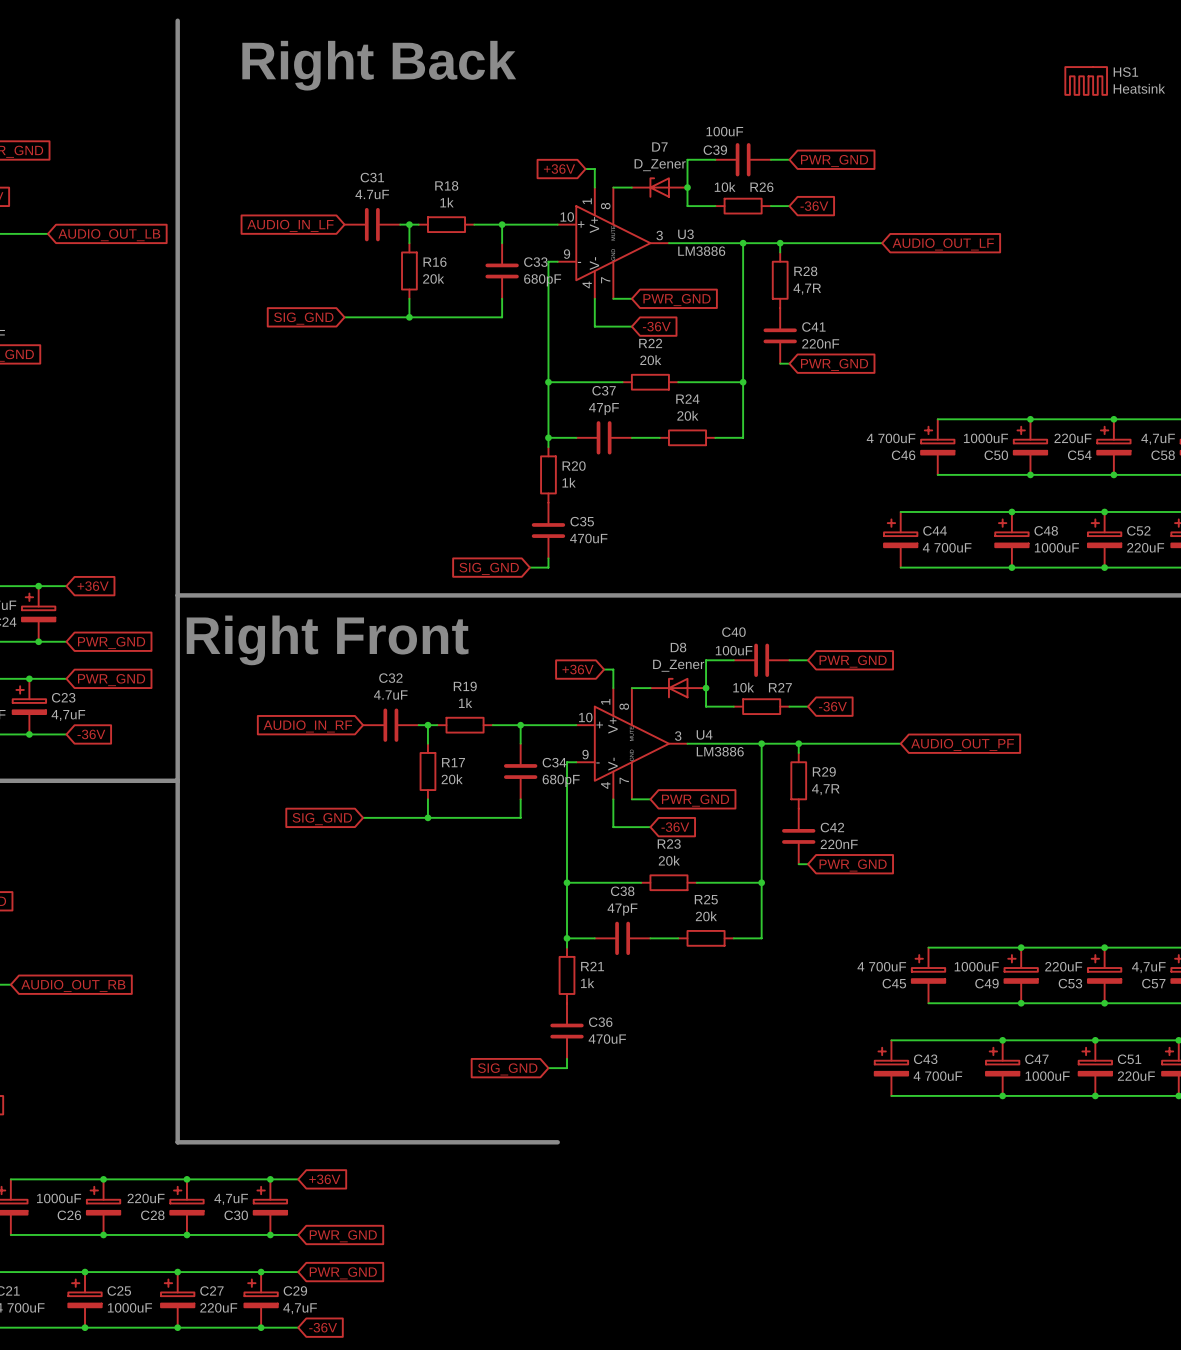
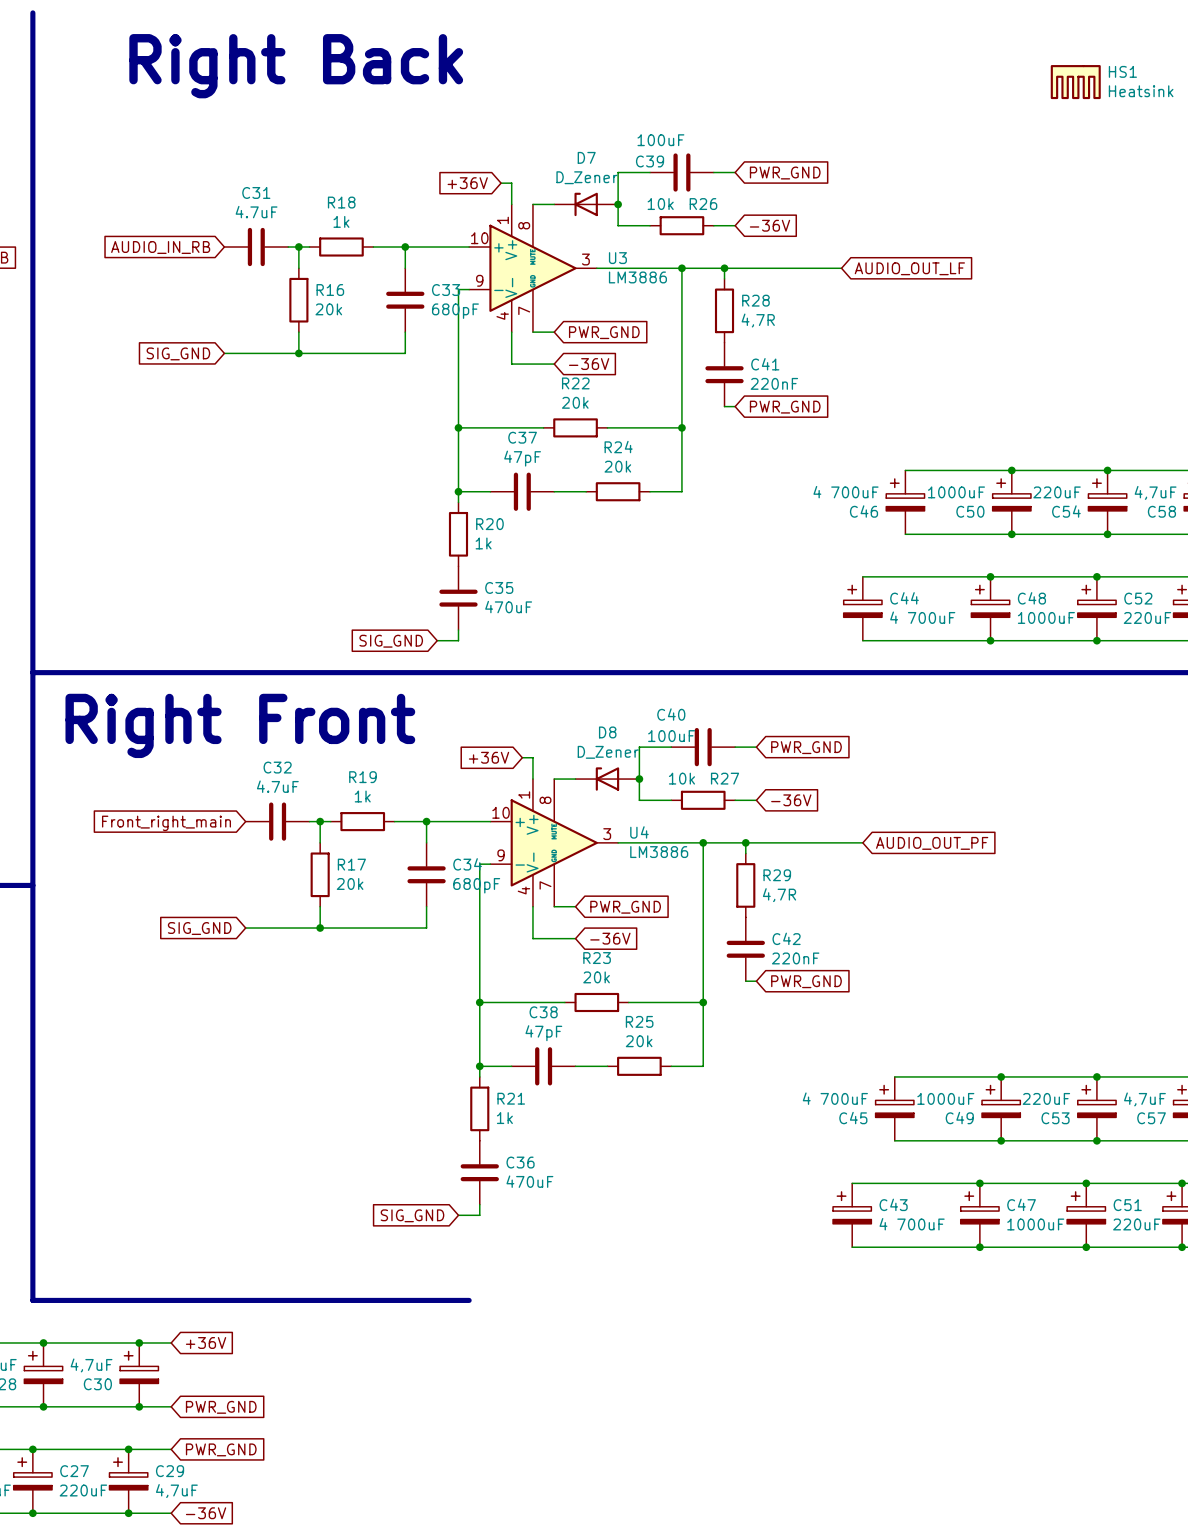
global label: AUDIO_IN_LF (290, 225) -> AUDIO_IN_RB (160, 247)
global label: AUDIO_IN_RF (307, 726) -> Front_right_main (166, 823)

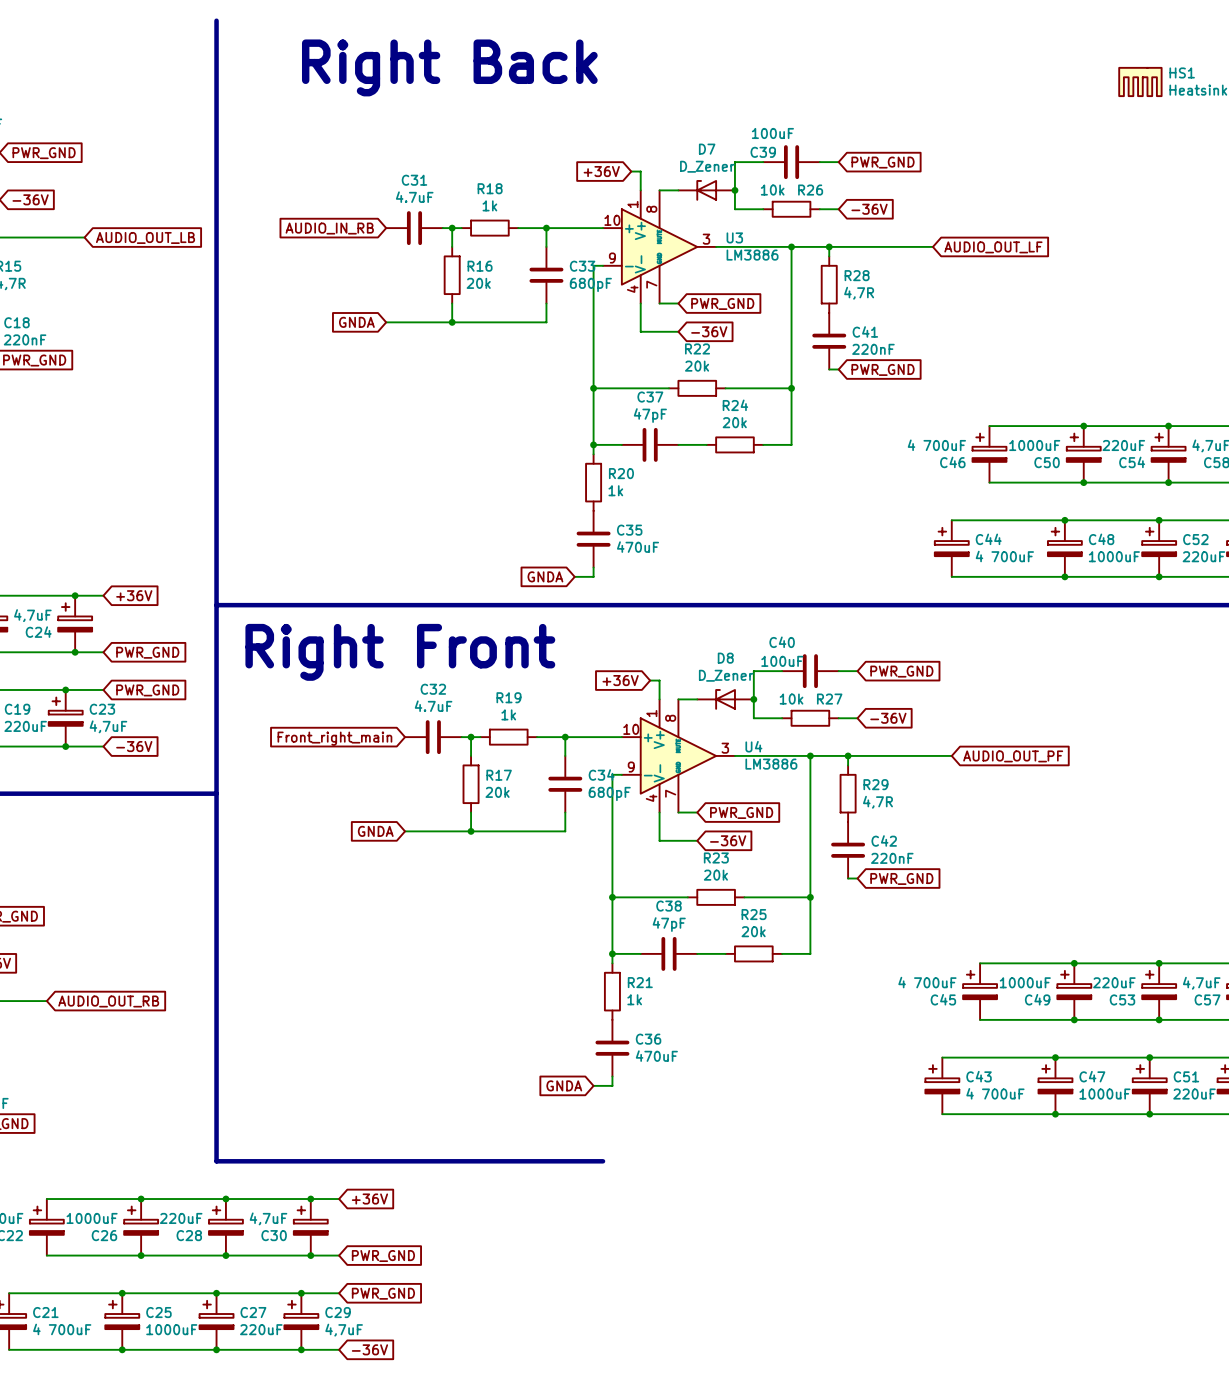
global label: SIG_GND (178, 353) -> GNDA (356, 322)
global label: SIG_GND (391, 641) -> GNDA (545, 576)
global label: SIG_GND (199, 928) -> GNDA (375, 831)
global label: SIG_GND (412, 1215) -> GNDA (564, 1085)

